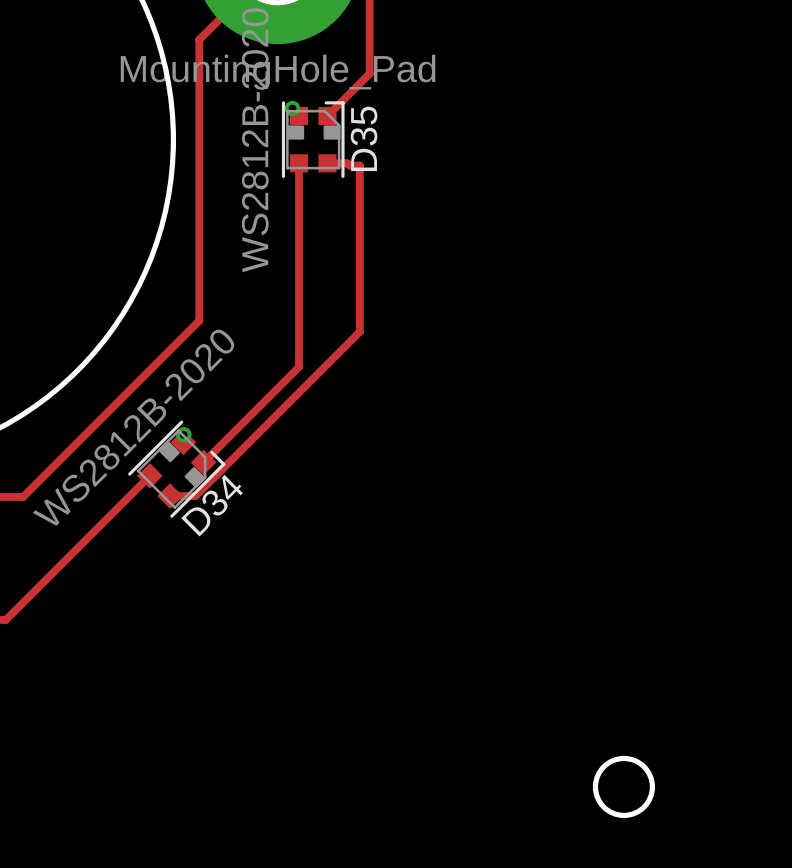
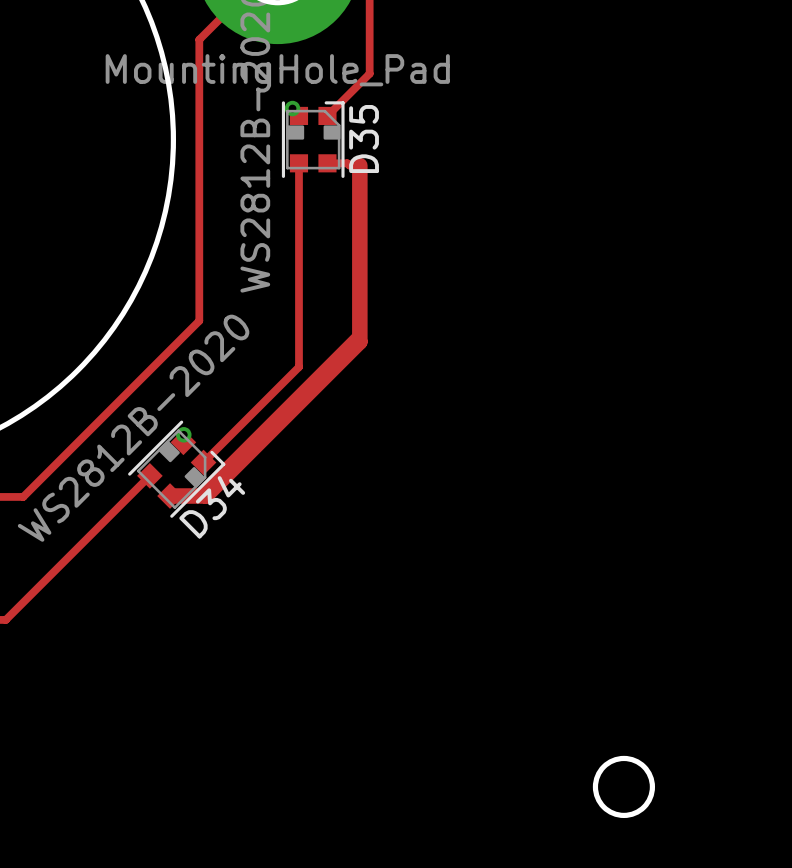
track: none -> (359, 165) (359, 341) (205, 496) (170, 496)

